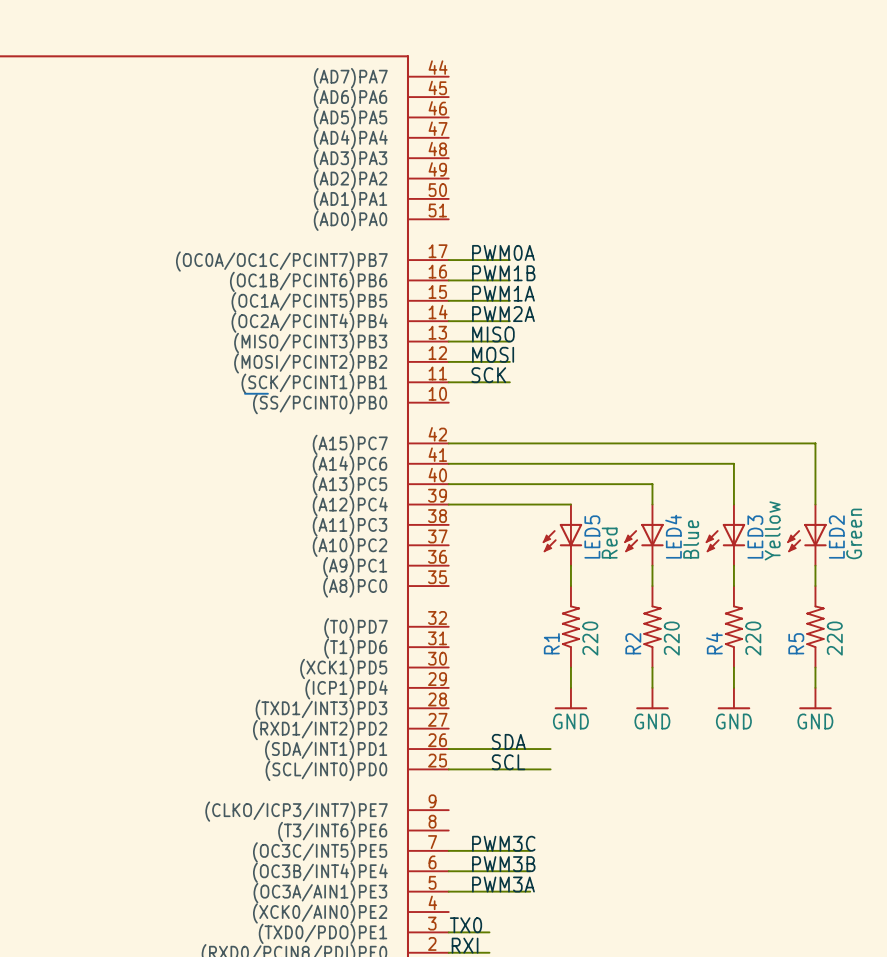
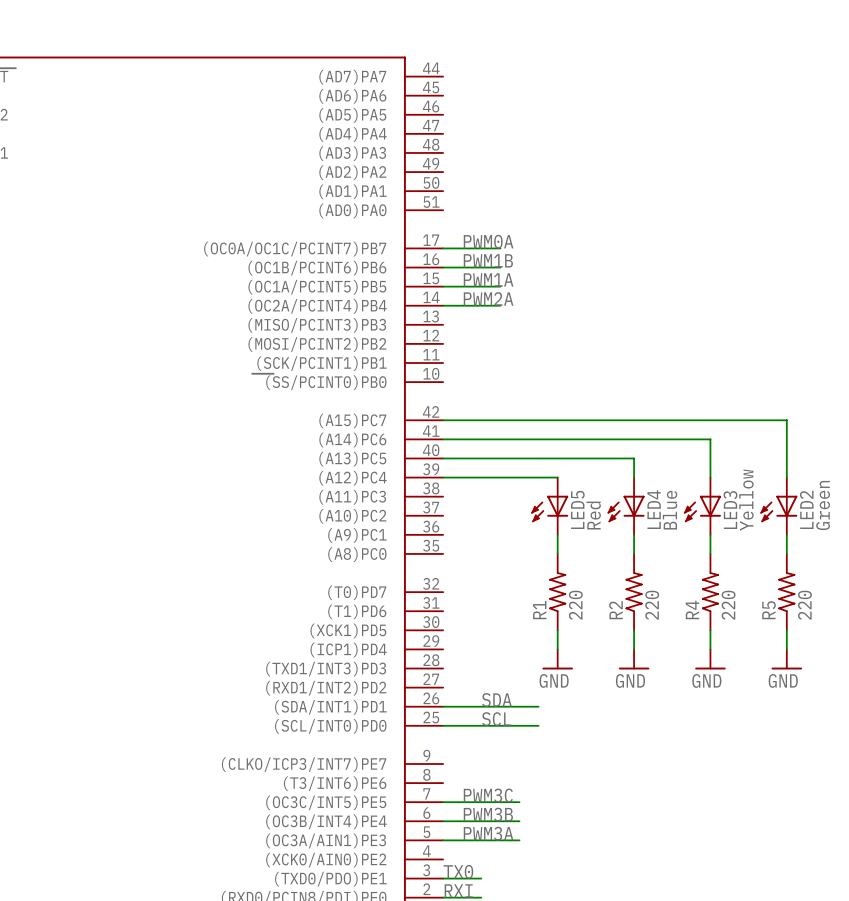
label: MISO (493, 334) -> none
wire: (448, 341) (509, 341) -> none
label: MOSI (493, 354) -> none
wire: (448, 361) (509, 361) -> none
label: SCK (488, 375) -> none
wire: (448, 382) (509, 382) -> none

